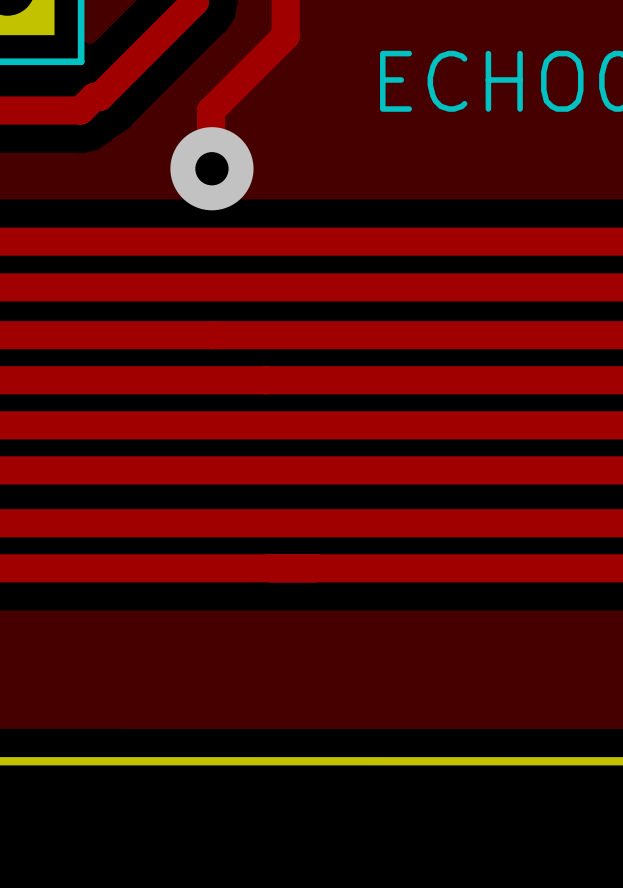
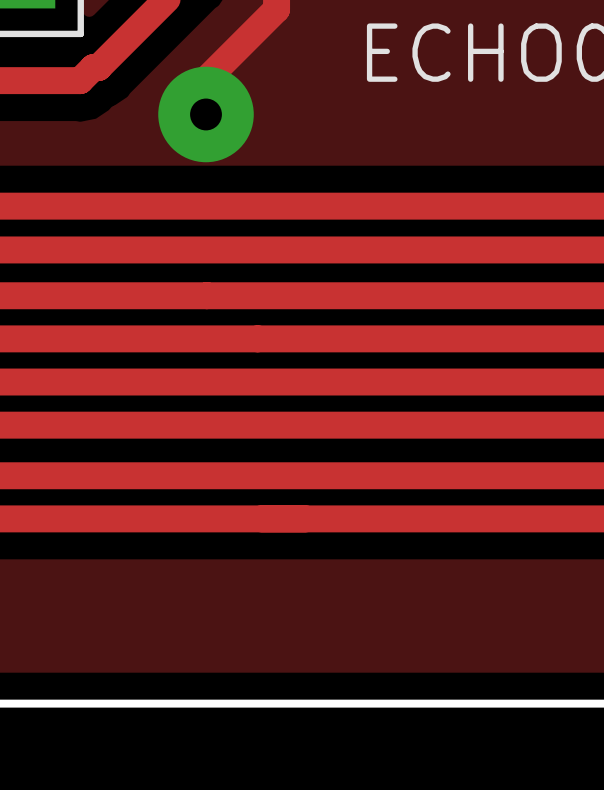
via size: [170, 127, 254, 211] -> [158, 66, 254, 163]

